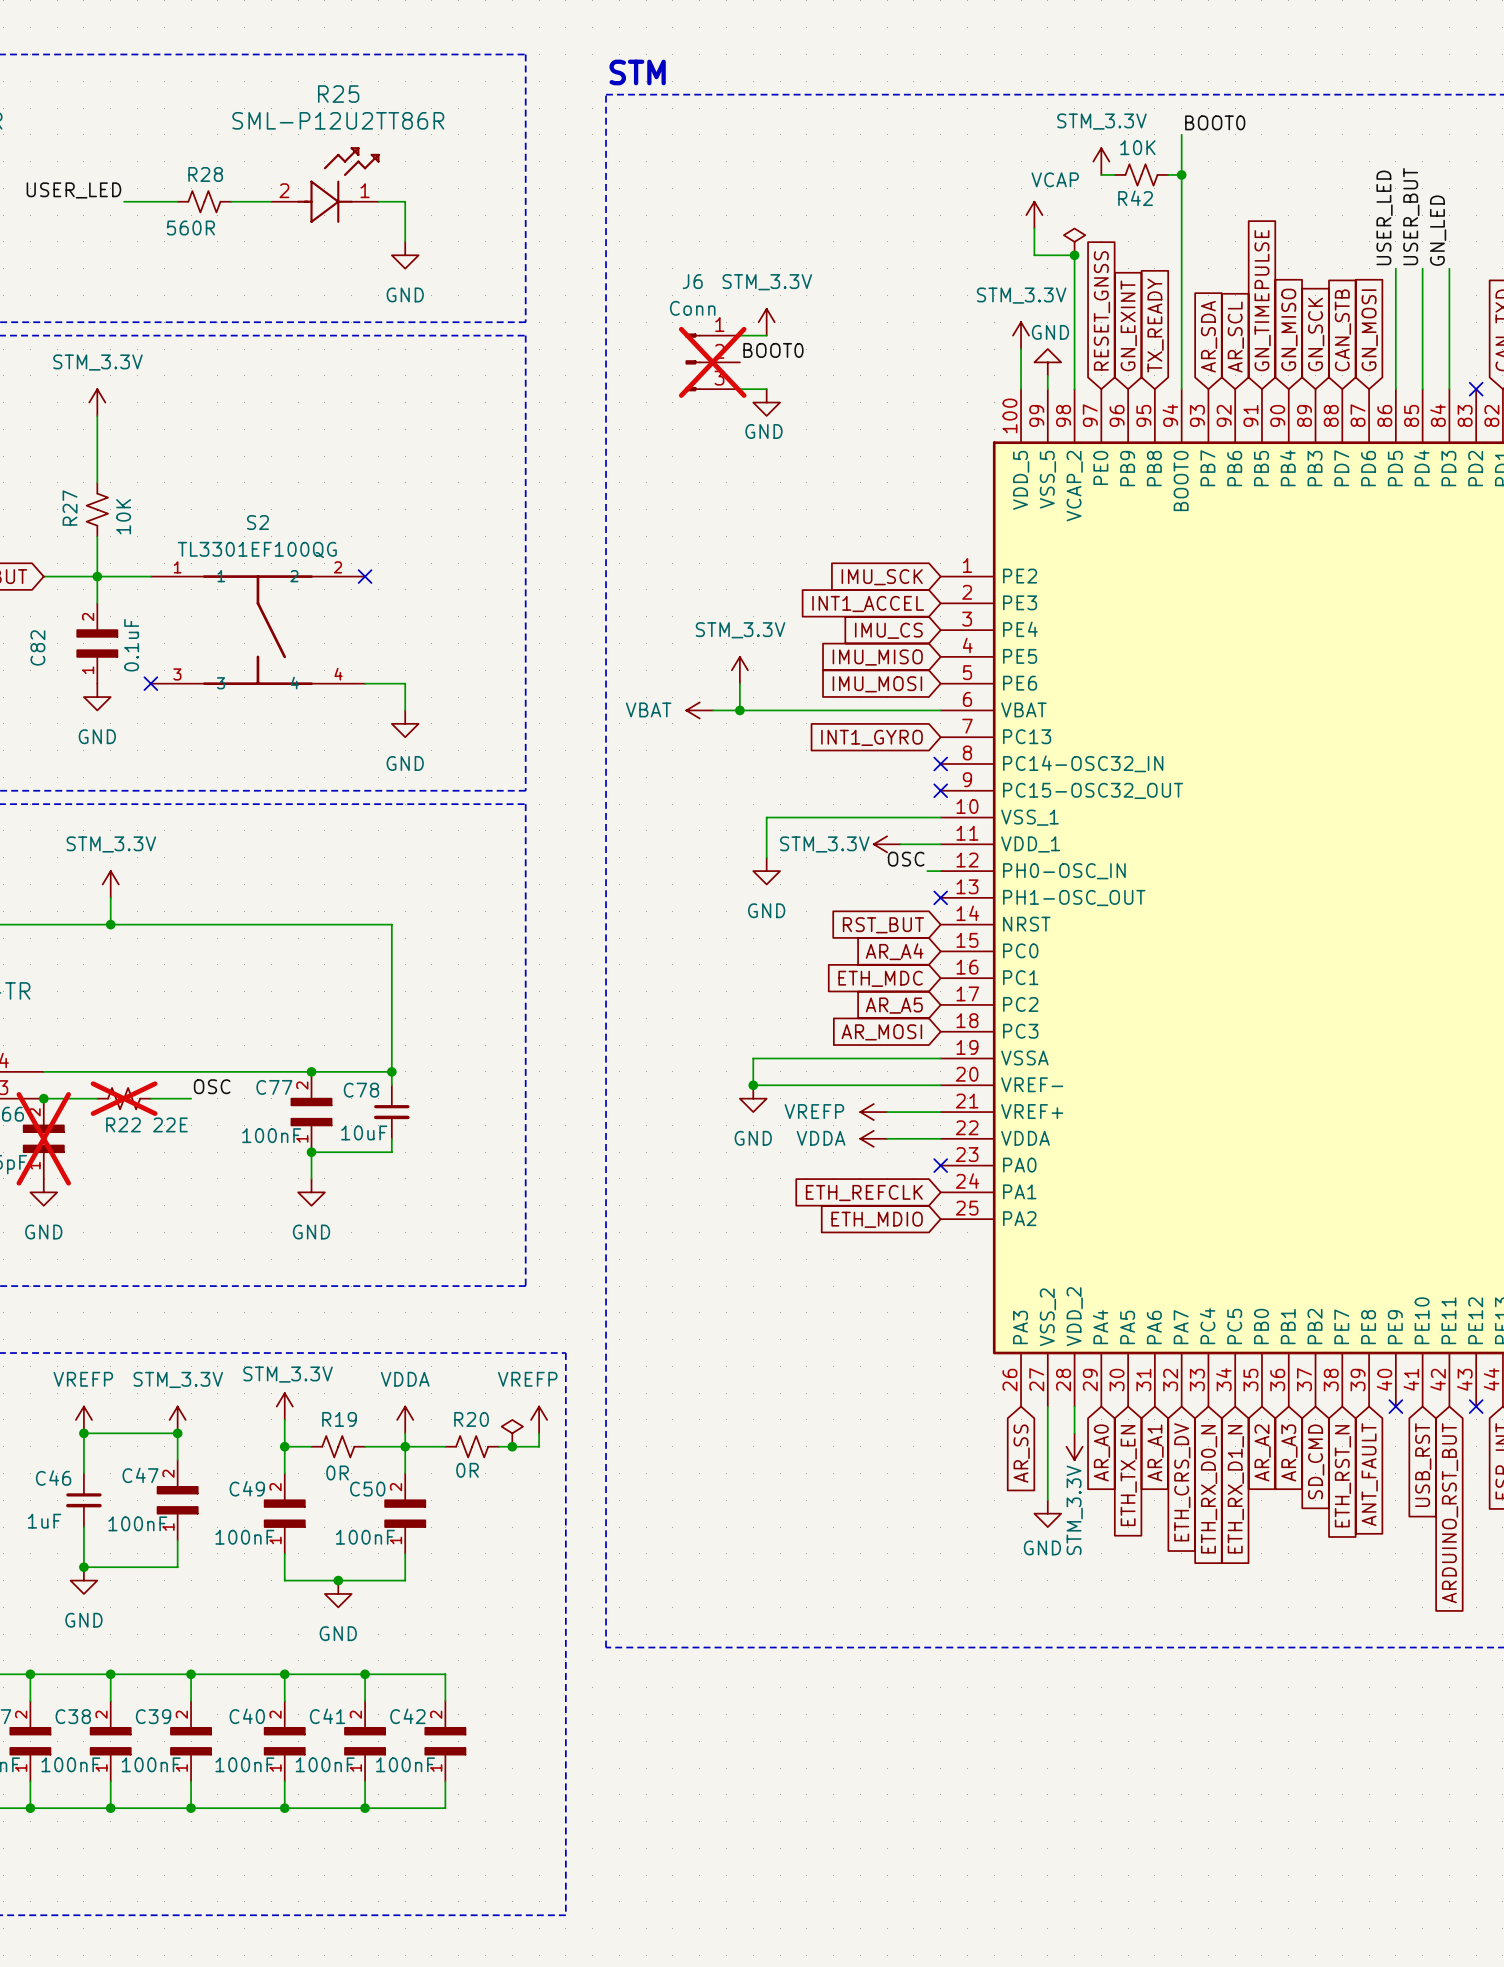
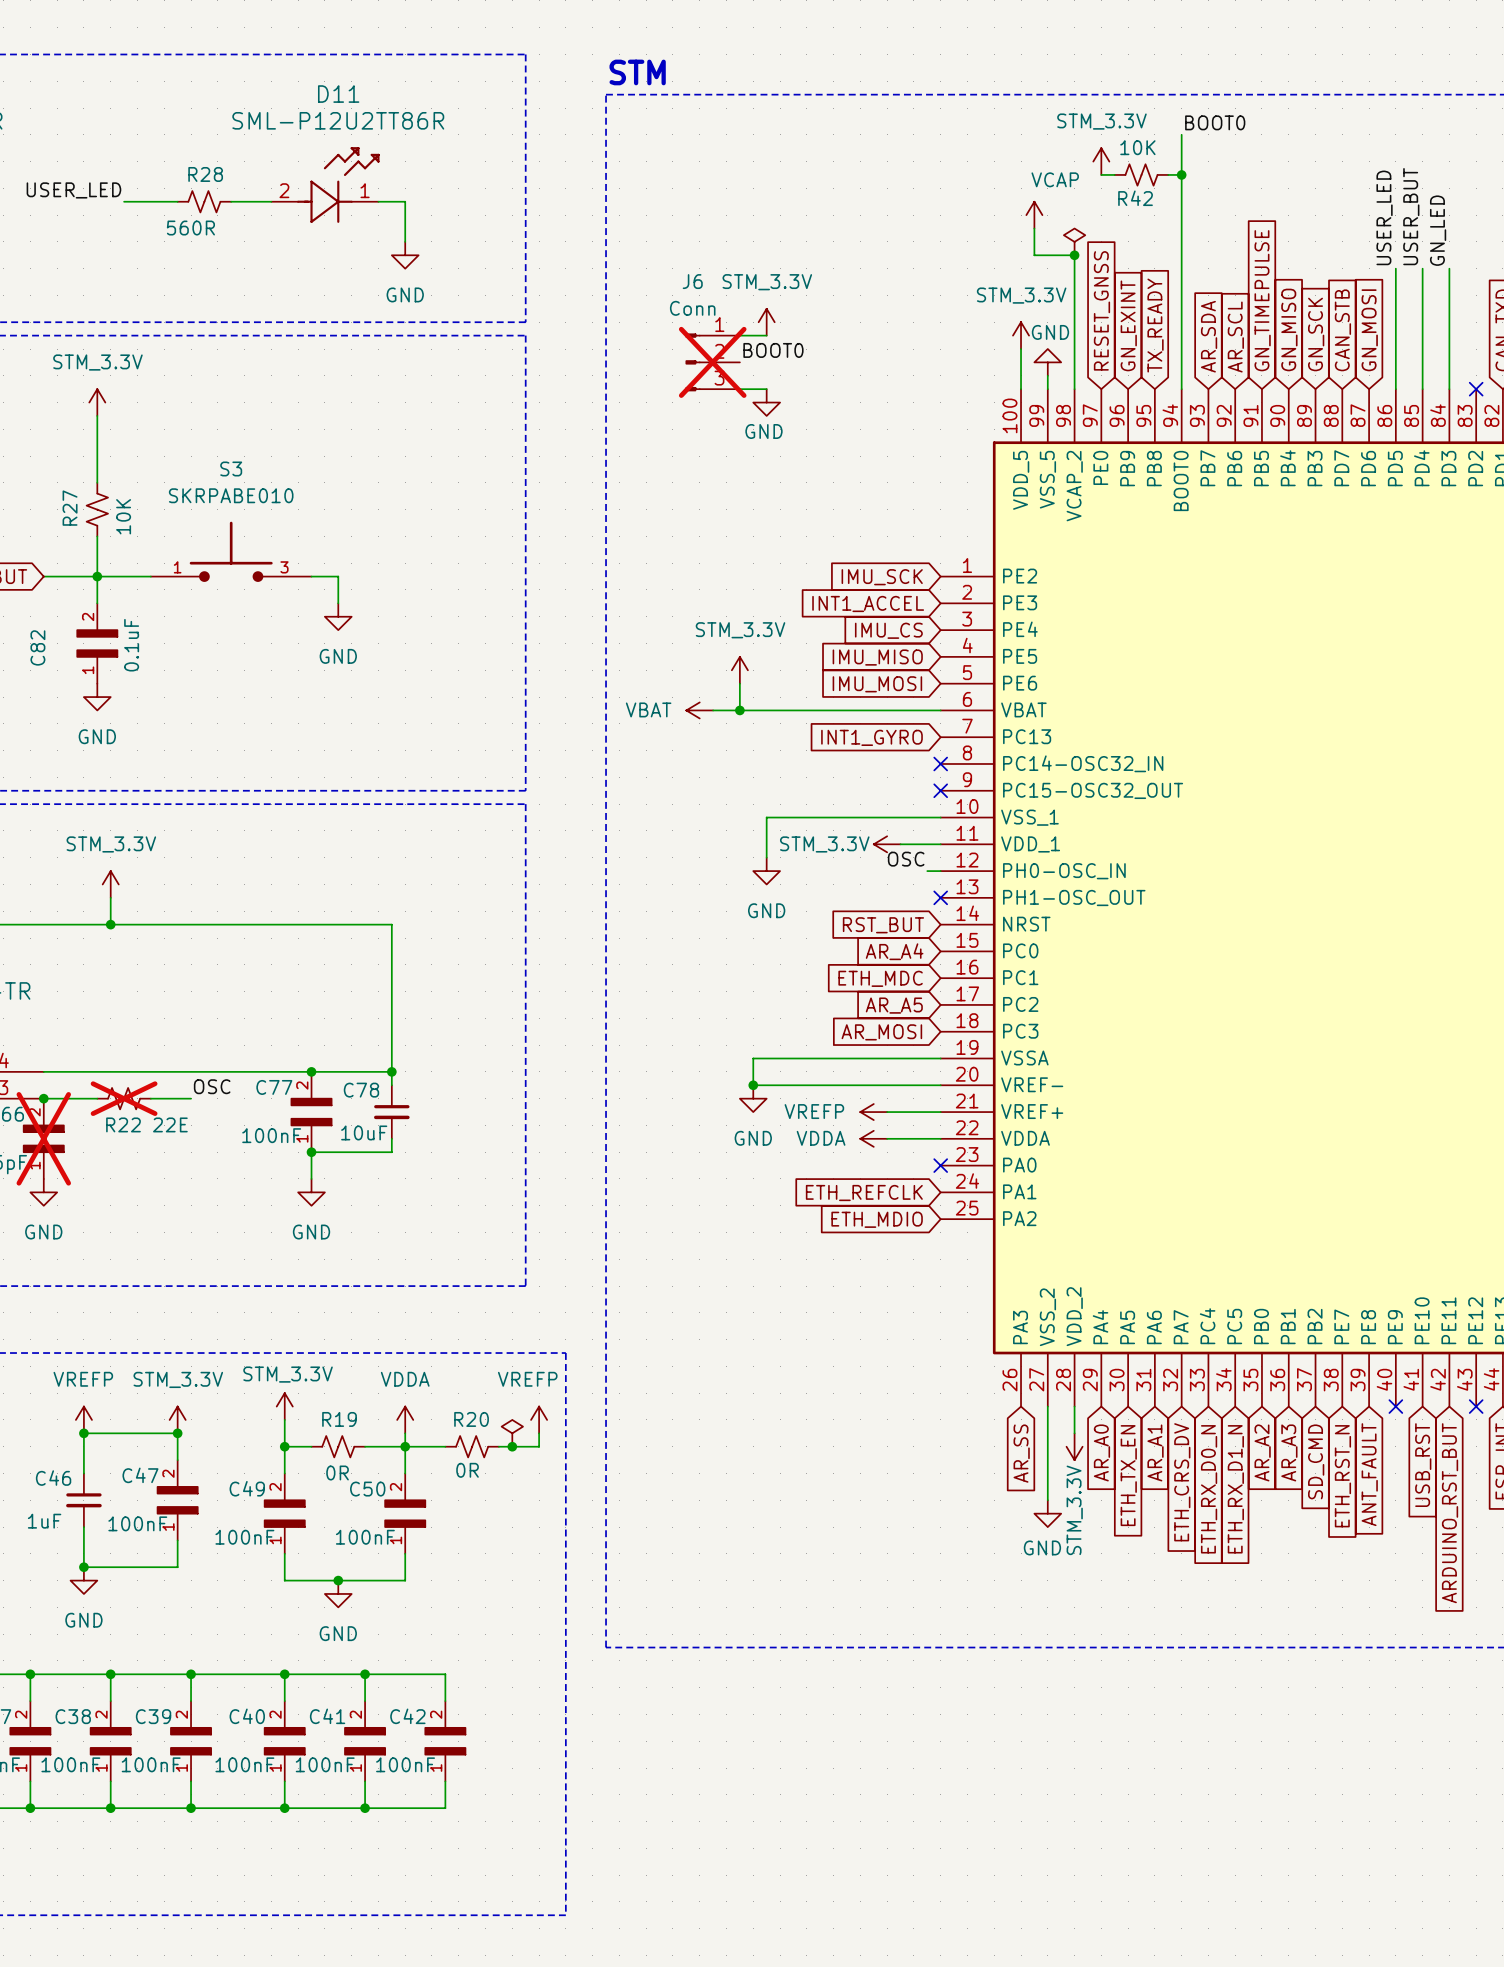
R25 name: R25 (338, 94) -> D11 (338, 94)
S3: none -> SKRPABE010 (231, 551)
wire: none -> (311, 576) (338, 576) (338, 603)
no-connect mark: (365, 576) -> none
S2: TL3301EF100QG (257, 630) -> none
no-connect mark: (150, 683) -> none
wire: (365, 683) (405, 683) (405, 710) -> none
power symbol position: GND (405, 723) -> GND (338, 616)

